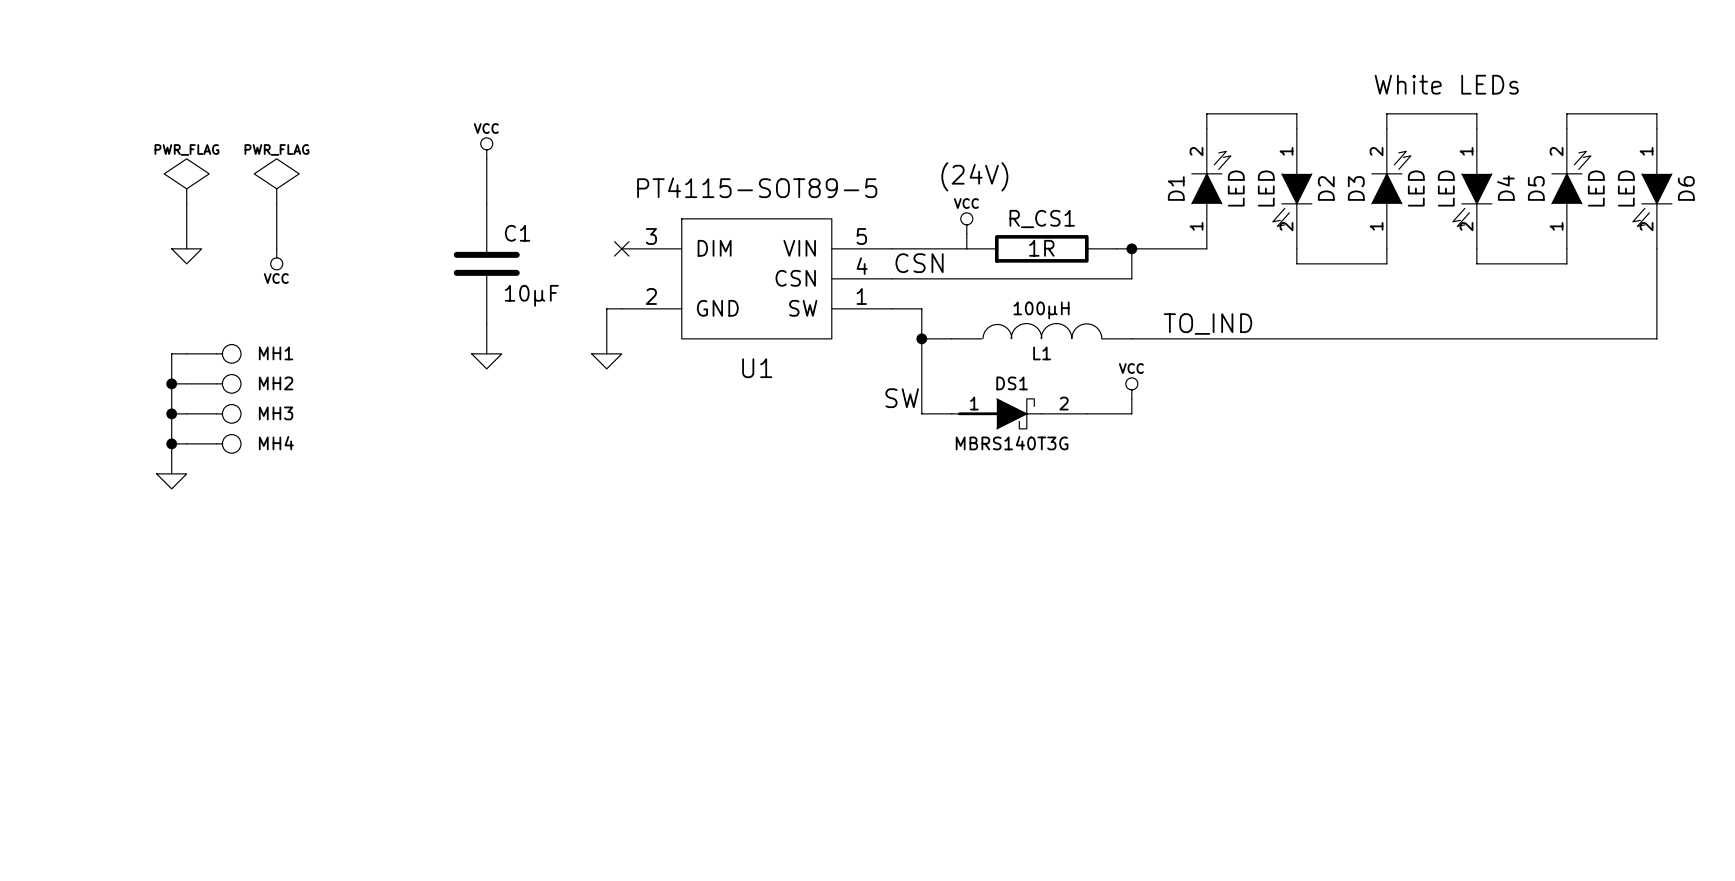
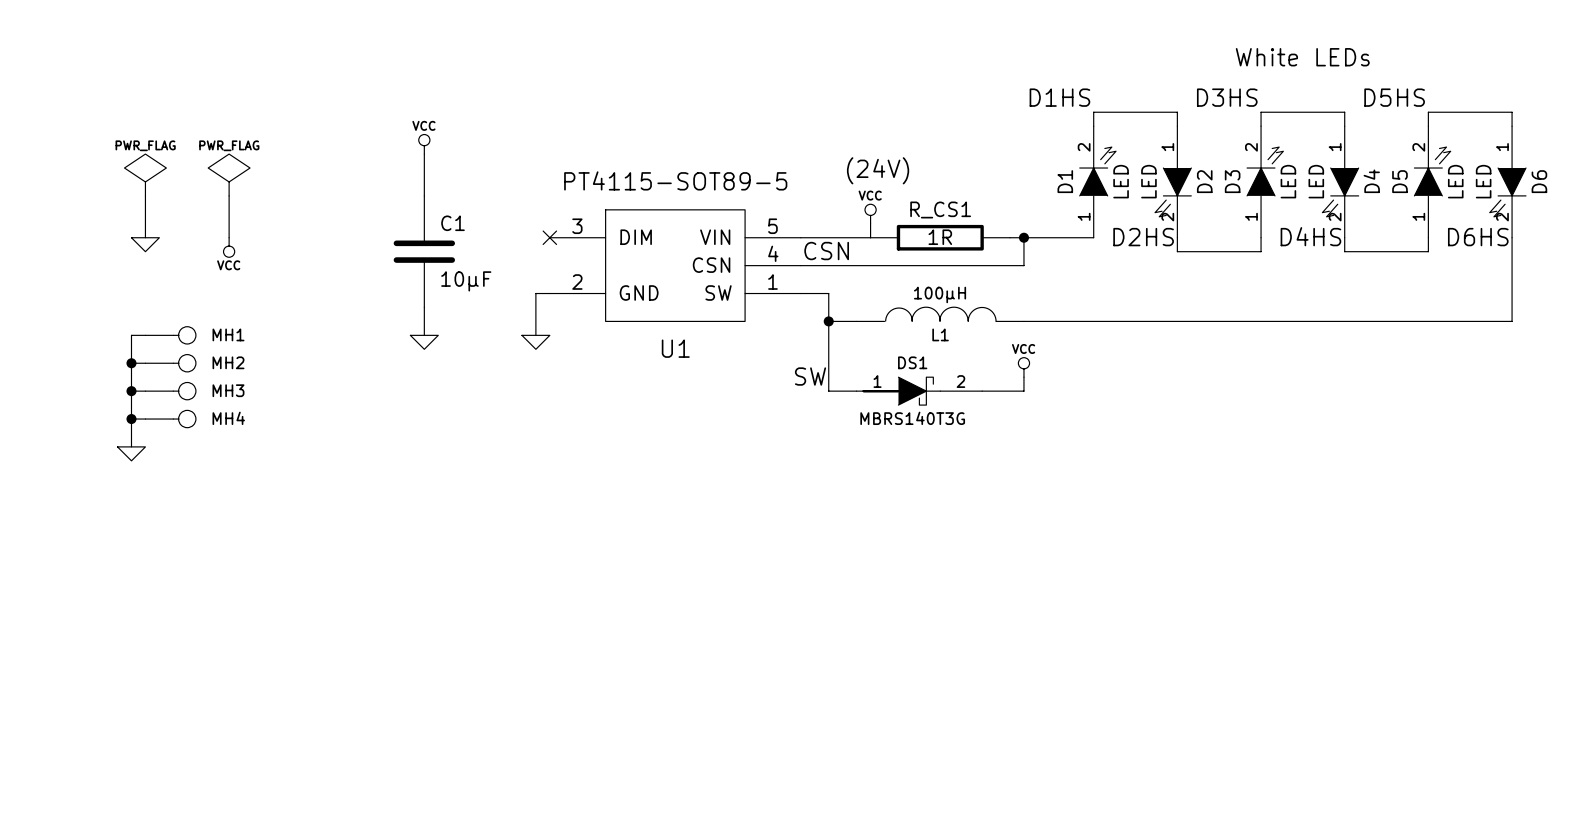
text position: White LEDs (1446, 84) -> White LEDs (1302, 57)
label: none -> D1HS (1059, 97)
label: none -> D3HS (1227, 97)
label: none -> D5HS (1394, 97)
label: none -> D4HS (1310, 236)
label: none -> D2HS (1143, 237)
label: none -> D6HS (1478, 237)
label: TO_IND (1208, 324) -> none

